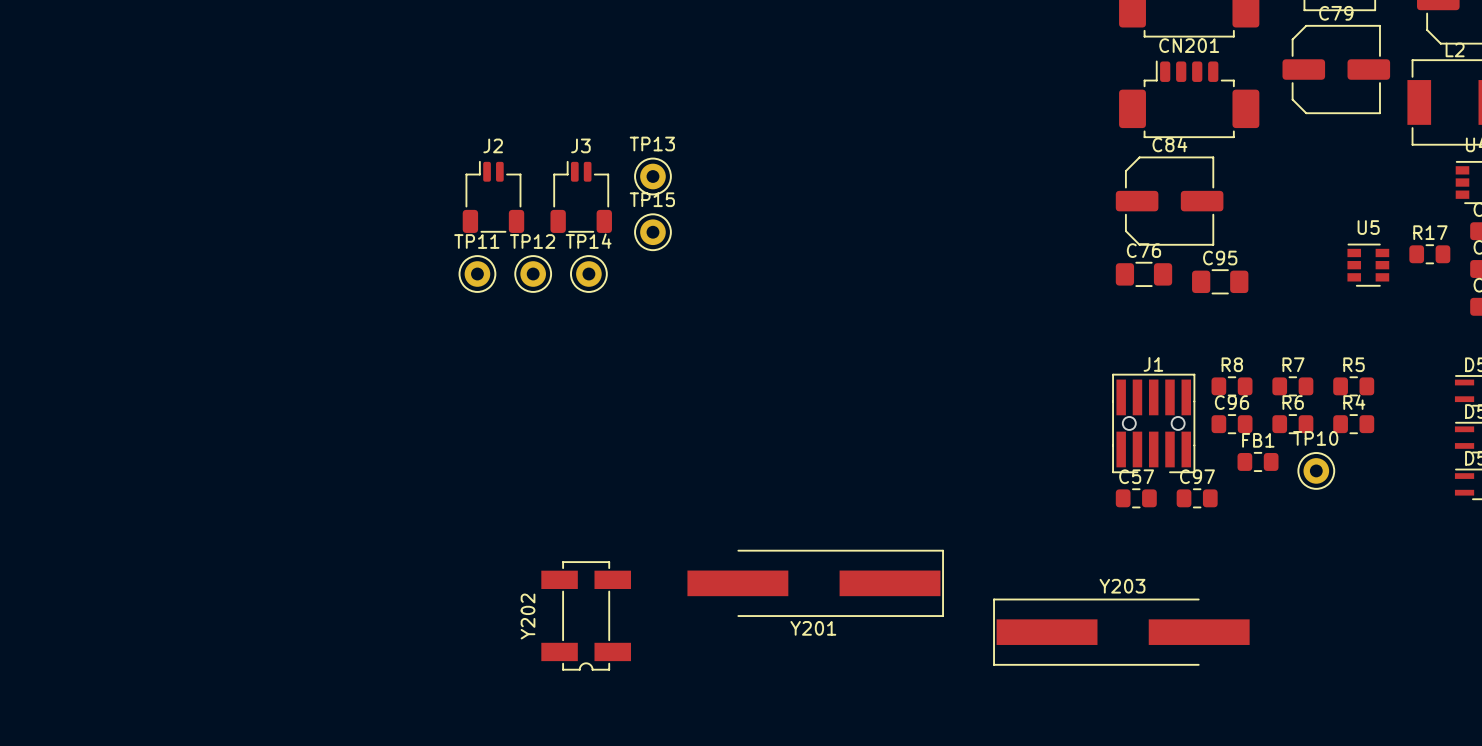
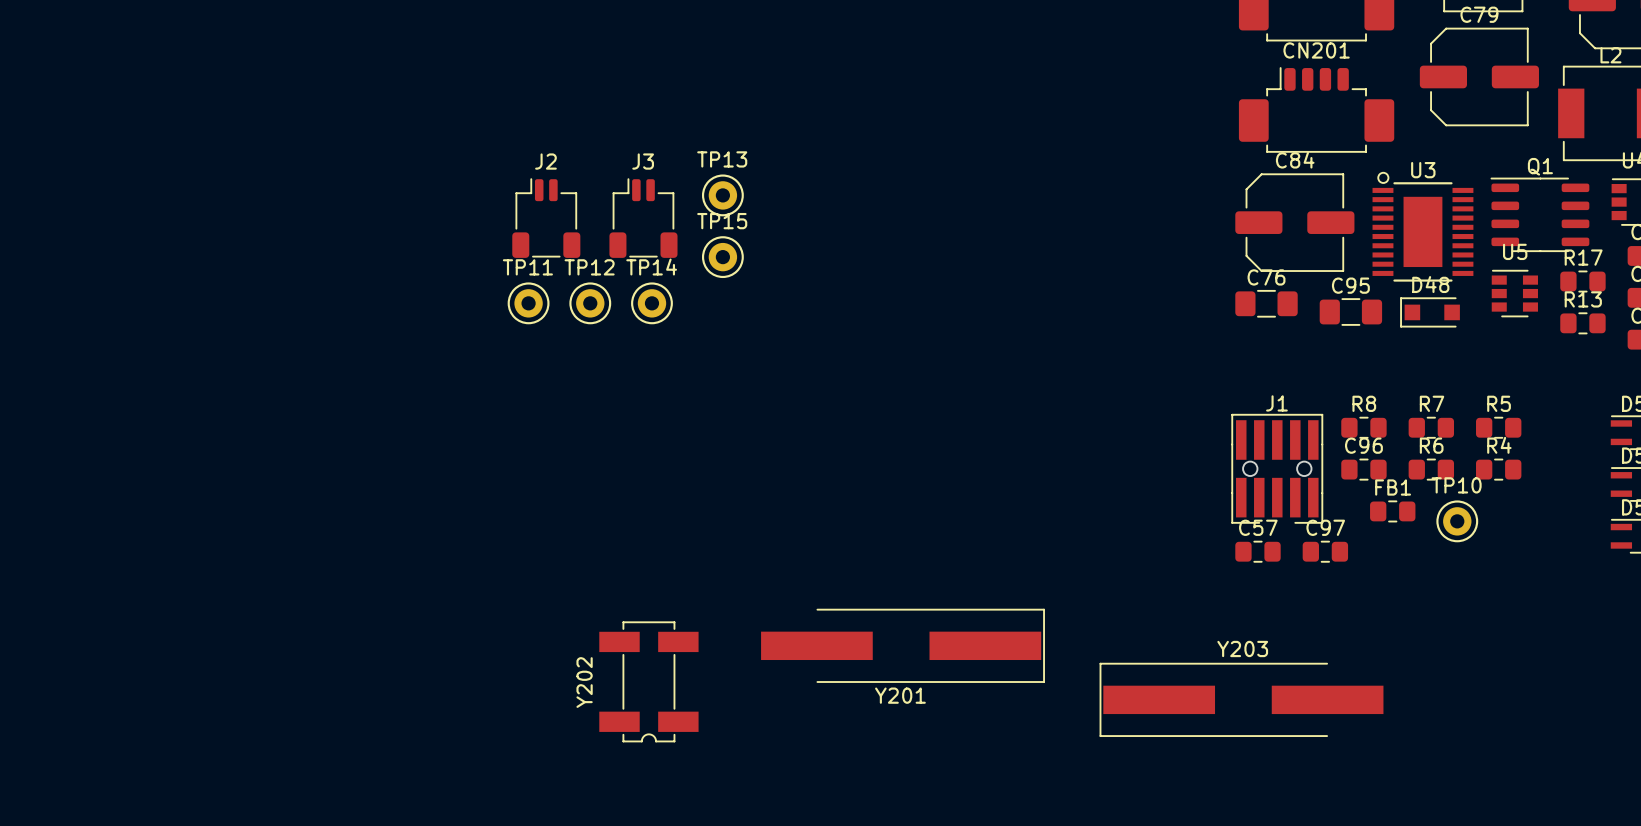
Q1: none -> (1539, 214)
U3: none -> (1422, 226)
D48: none -> (1430, 312)
R13: none -> (1582, 323)

